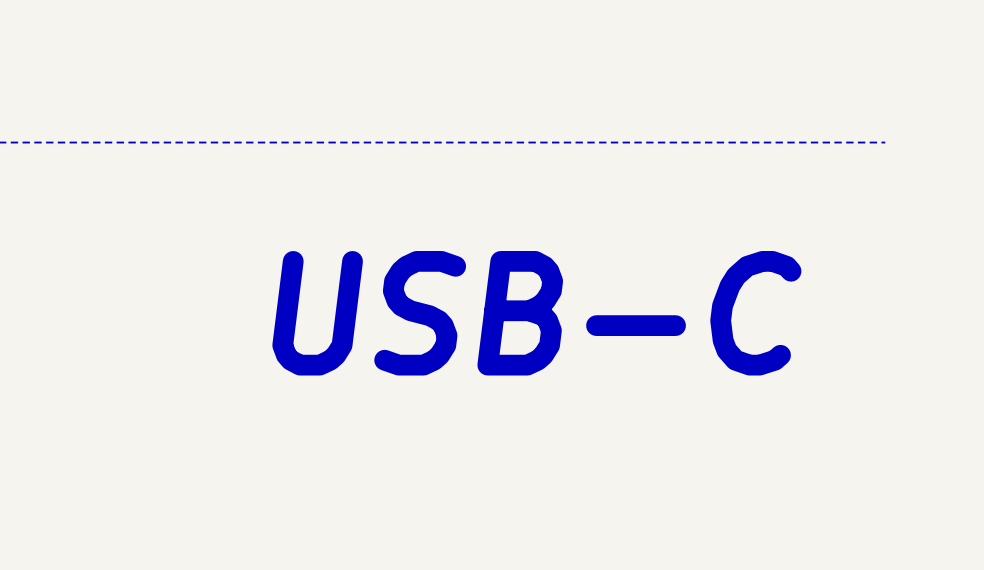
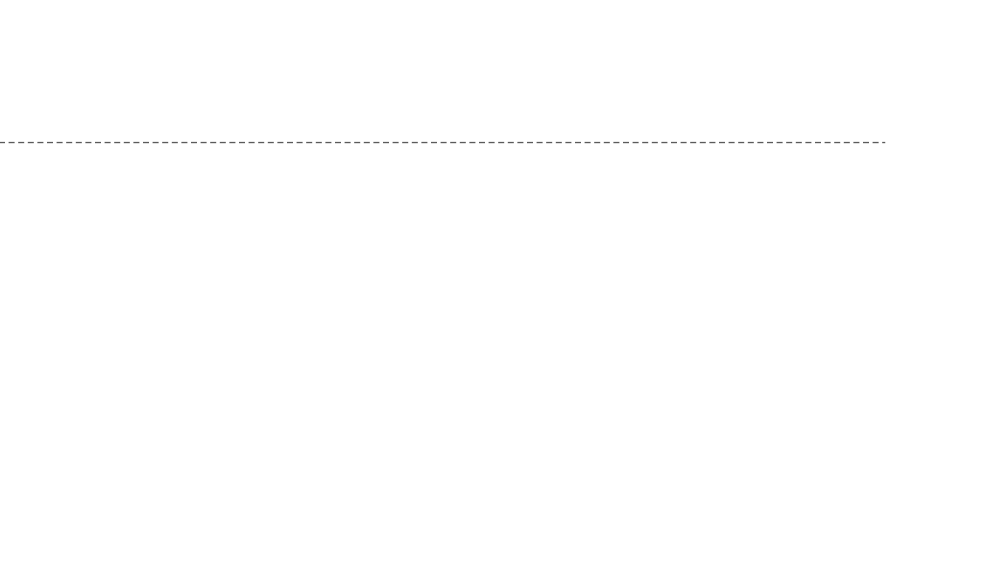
text: USB-C (536, 313) -> none

